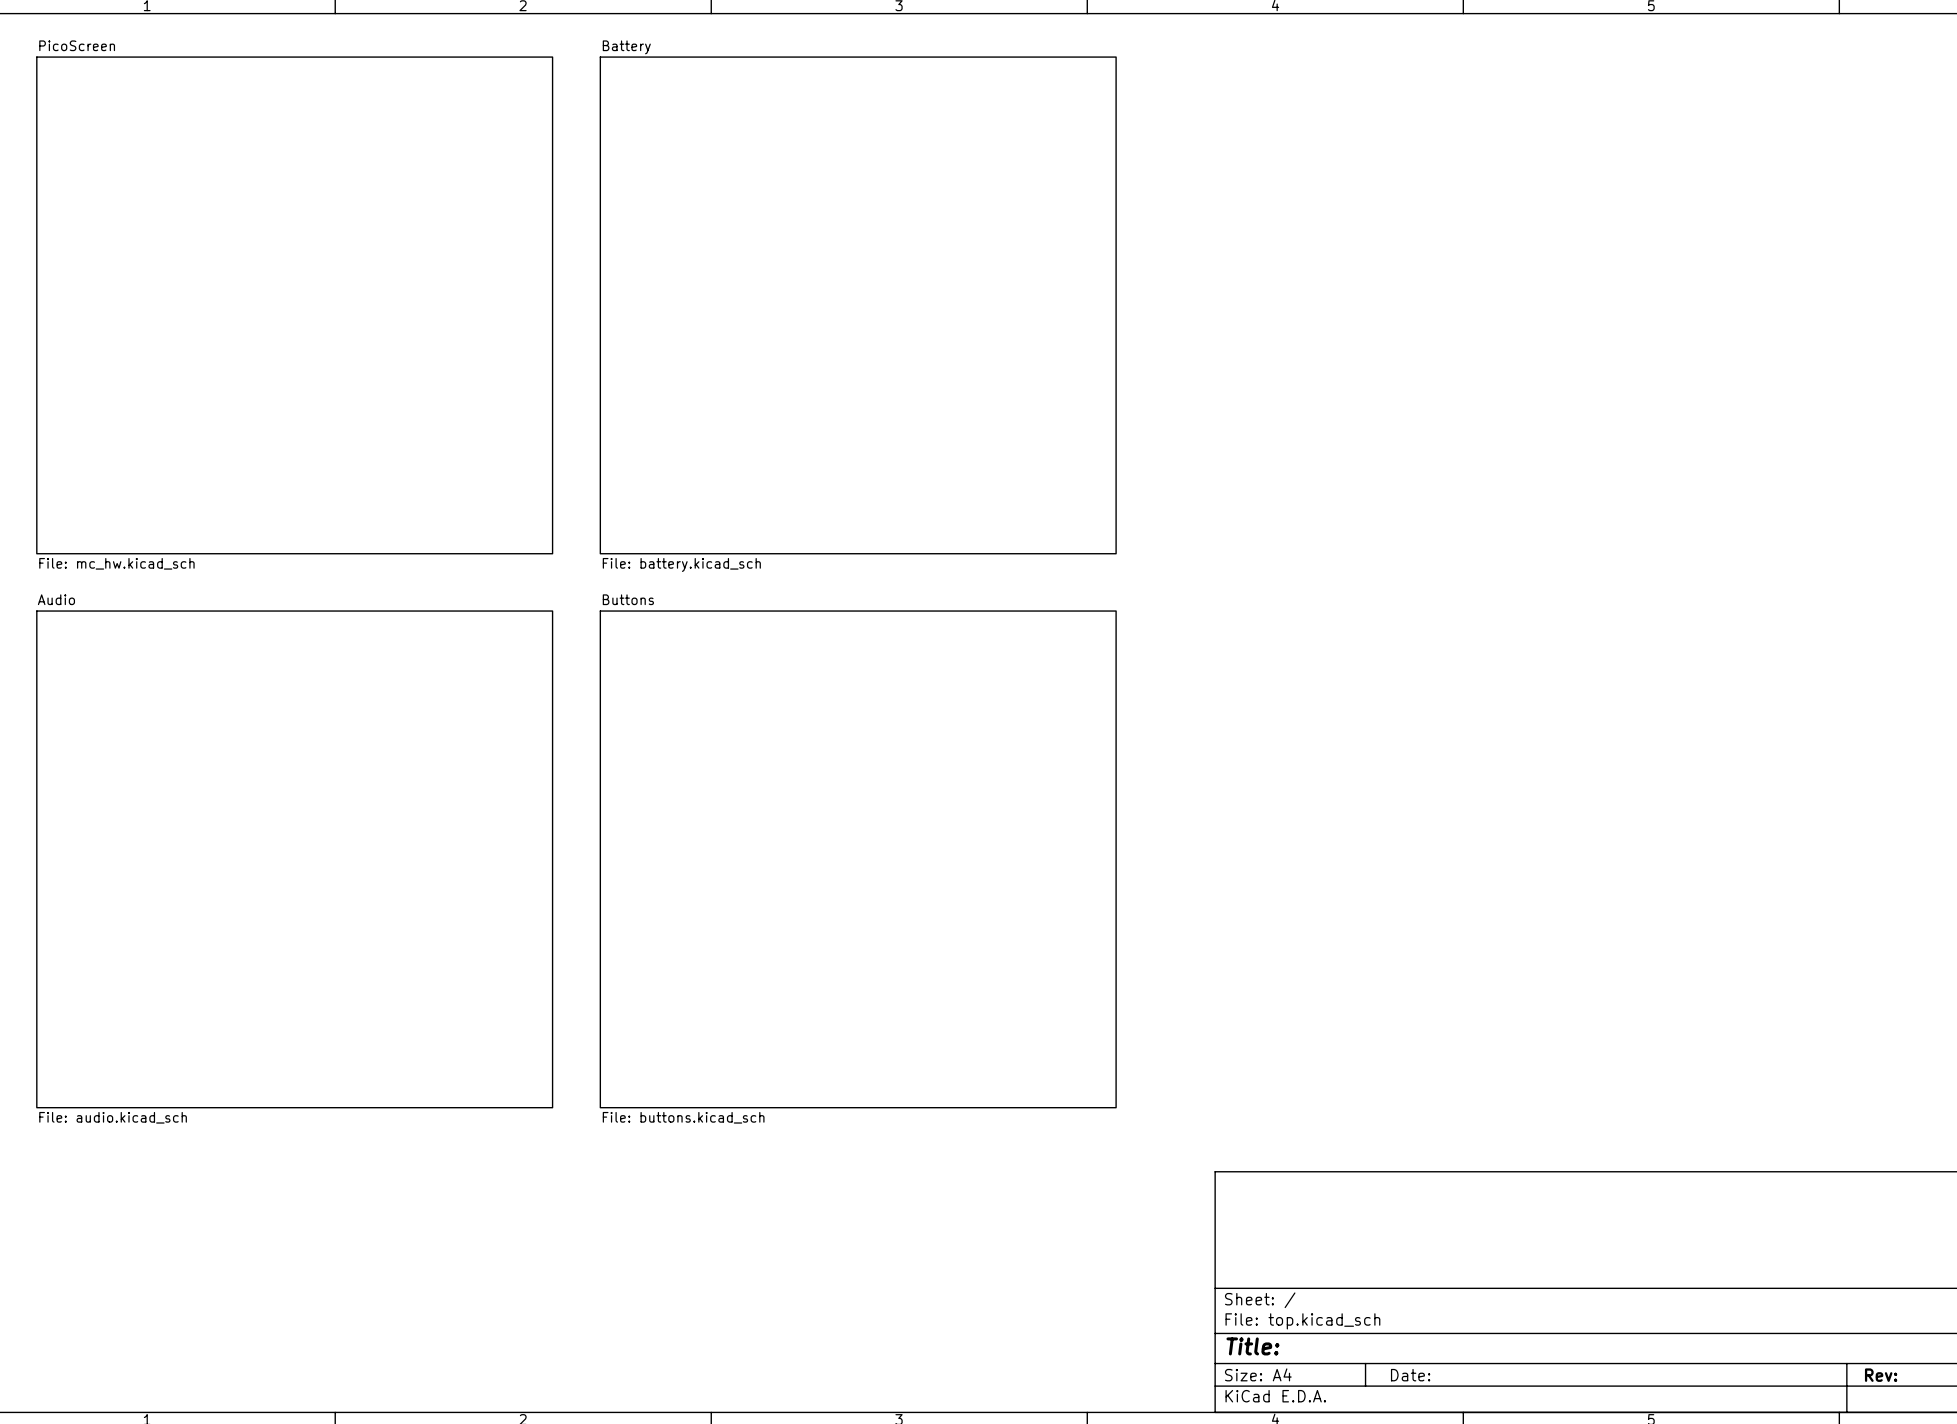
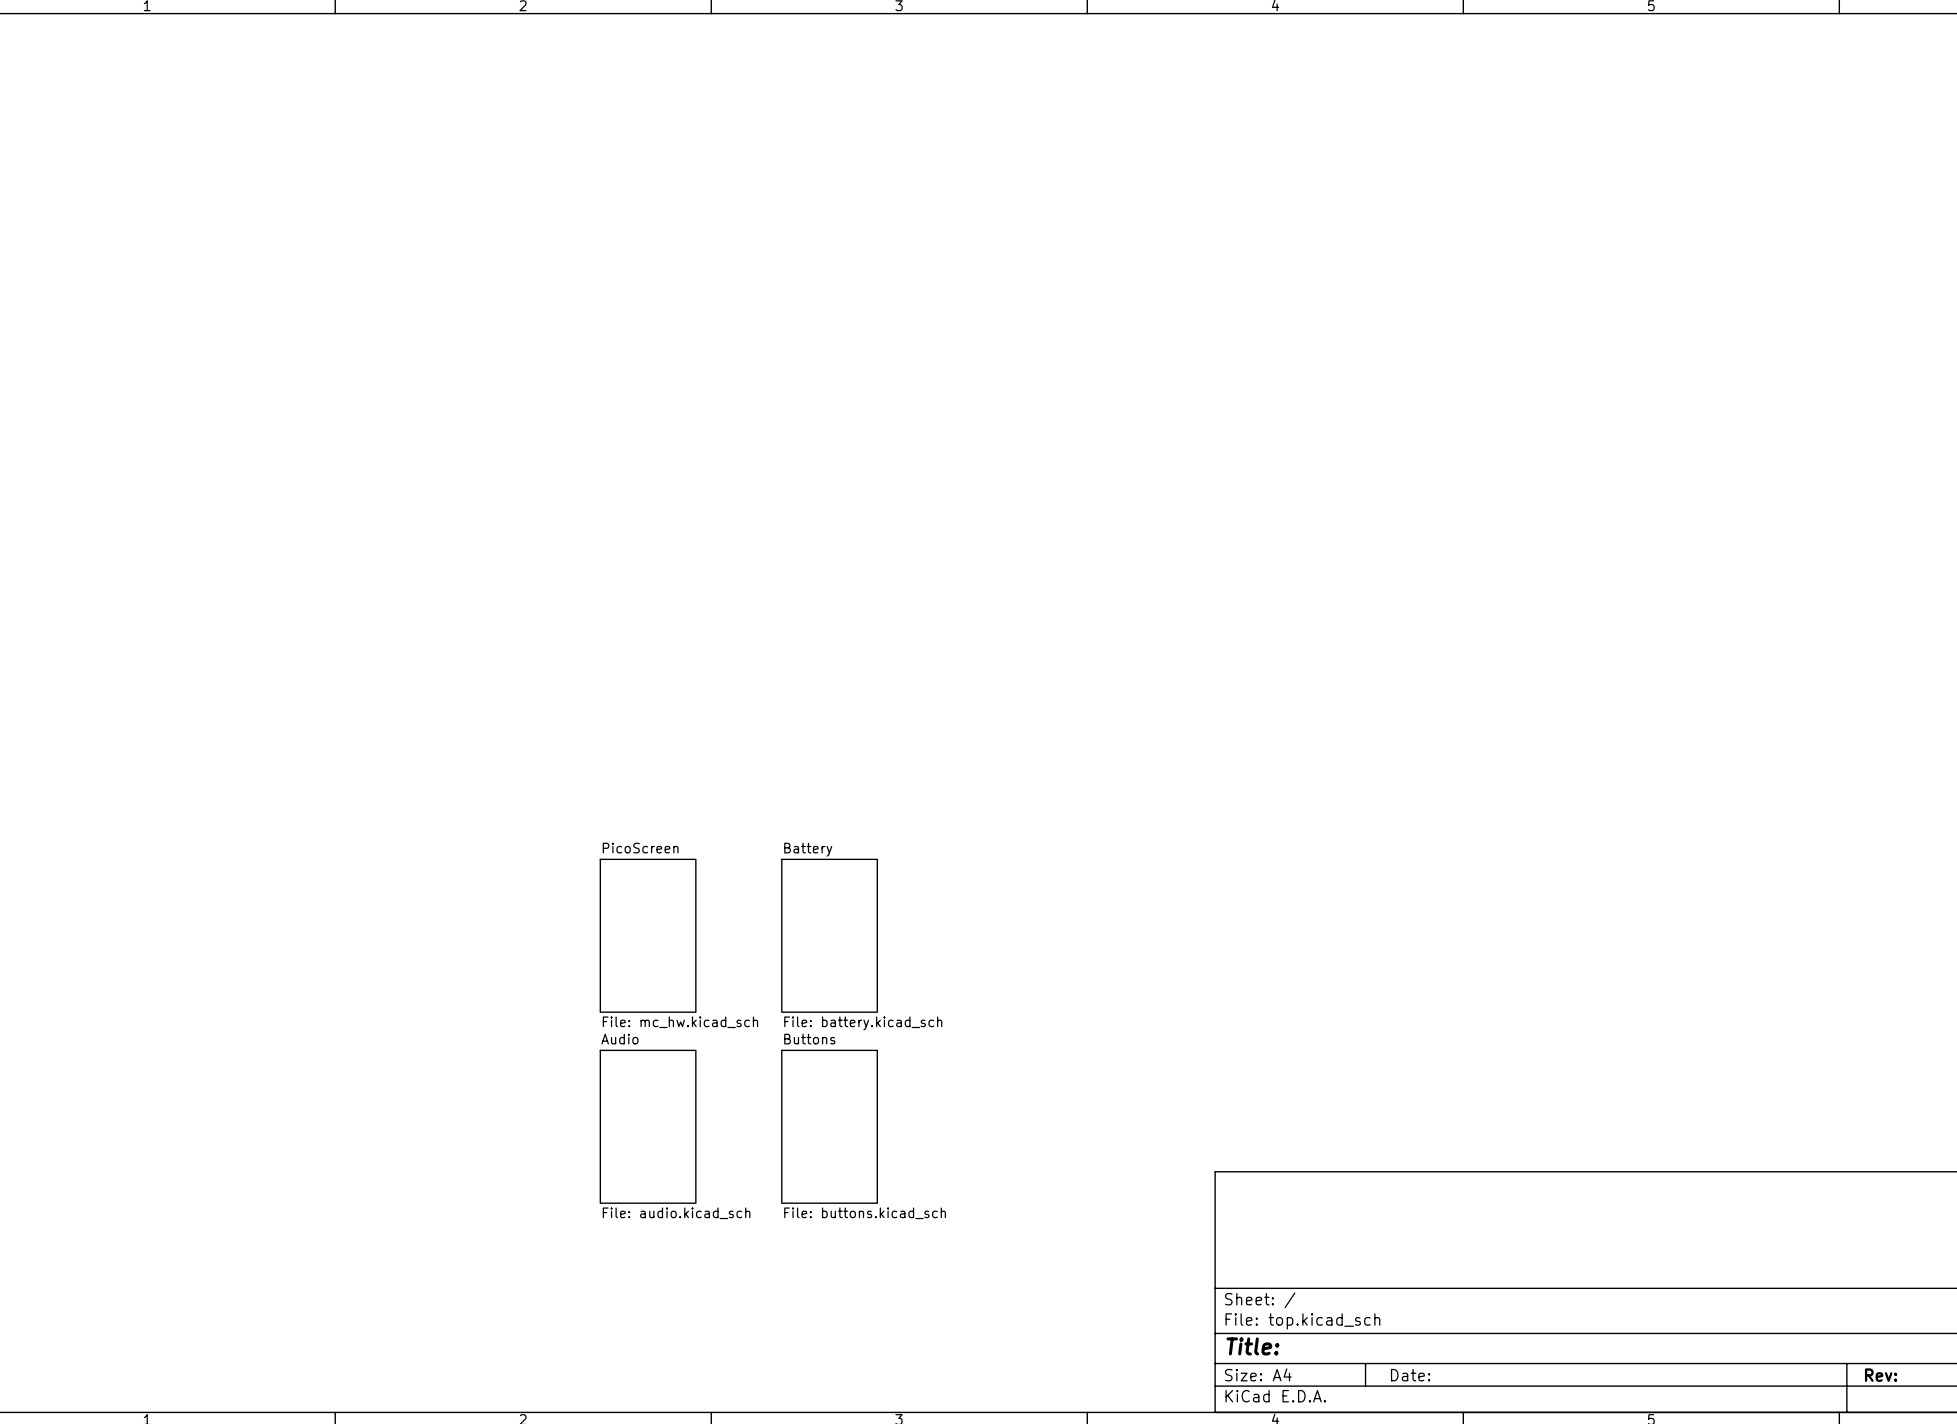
sheet PicoScreen: File: mc_hw.kicad_sch (294, 305) -> none
sheet Battery: File: battery.kicad_sch (858, 305) -> none
sheet Audio: File: audio.kicad_sch (294, 859) -> none
sheet Buttons: File: buttons.kicad_sch (858, 859) -> none
sheet PicoScreen: none -> File: mc_hw.kicad_sch (648, 935)
sheet Battery: none -> File: battery.kicad_sch (829, 935)
sheet Audio: none -> File: audio.kicad_sch (648, 1126)
sheet Buttons: none -> File: buttons.kicad_sch (829, 1126)

